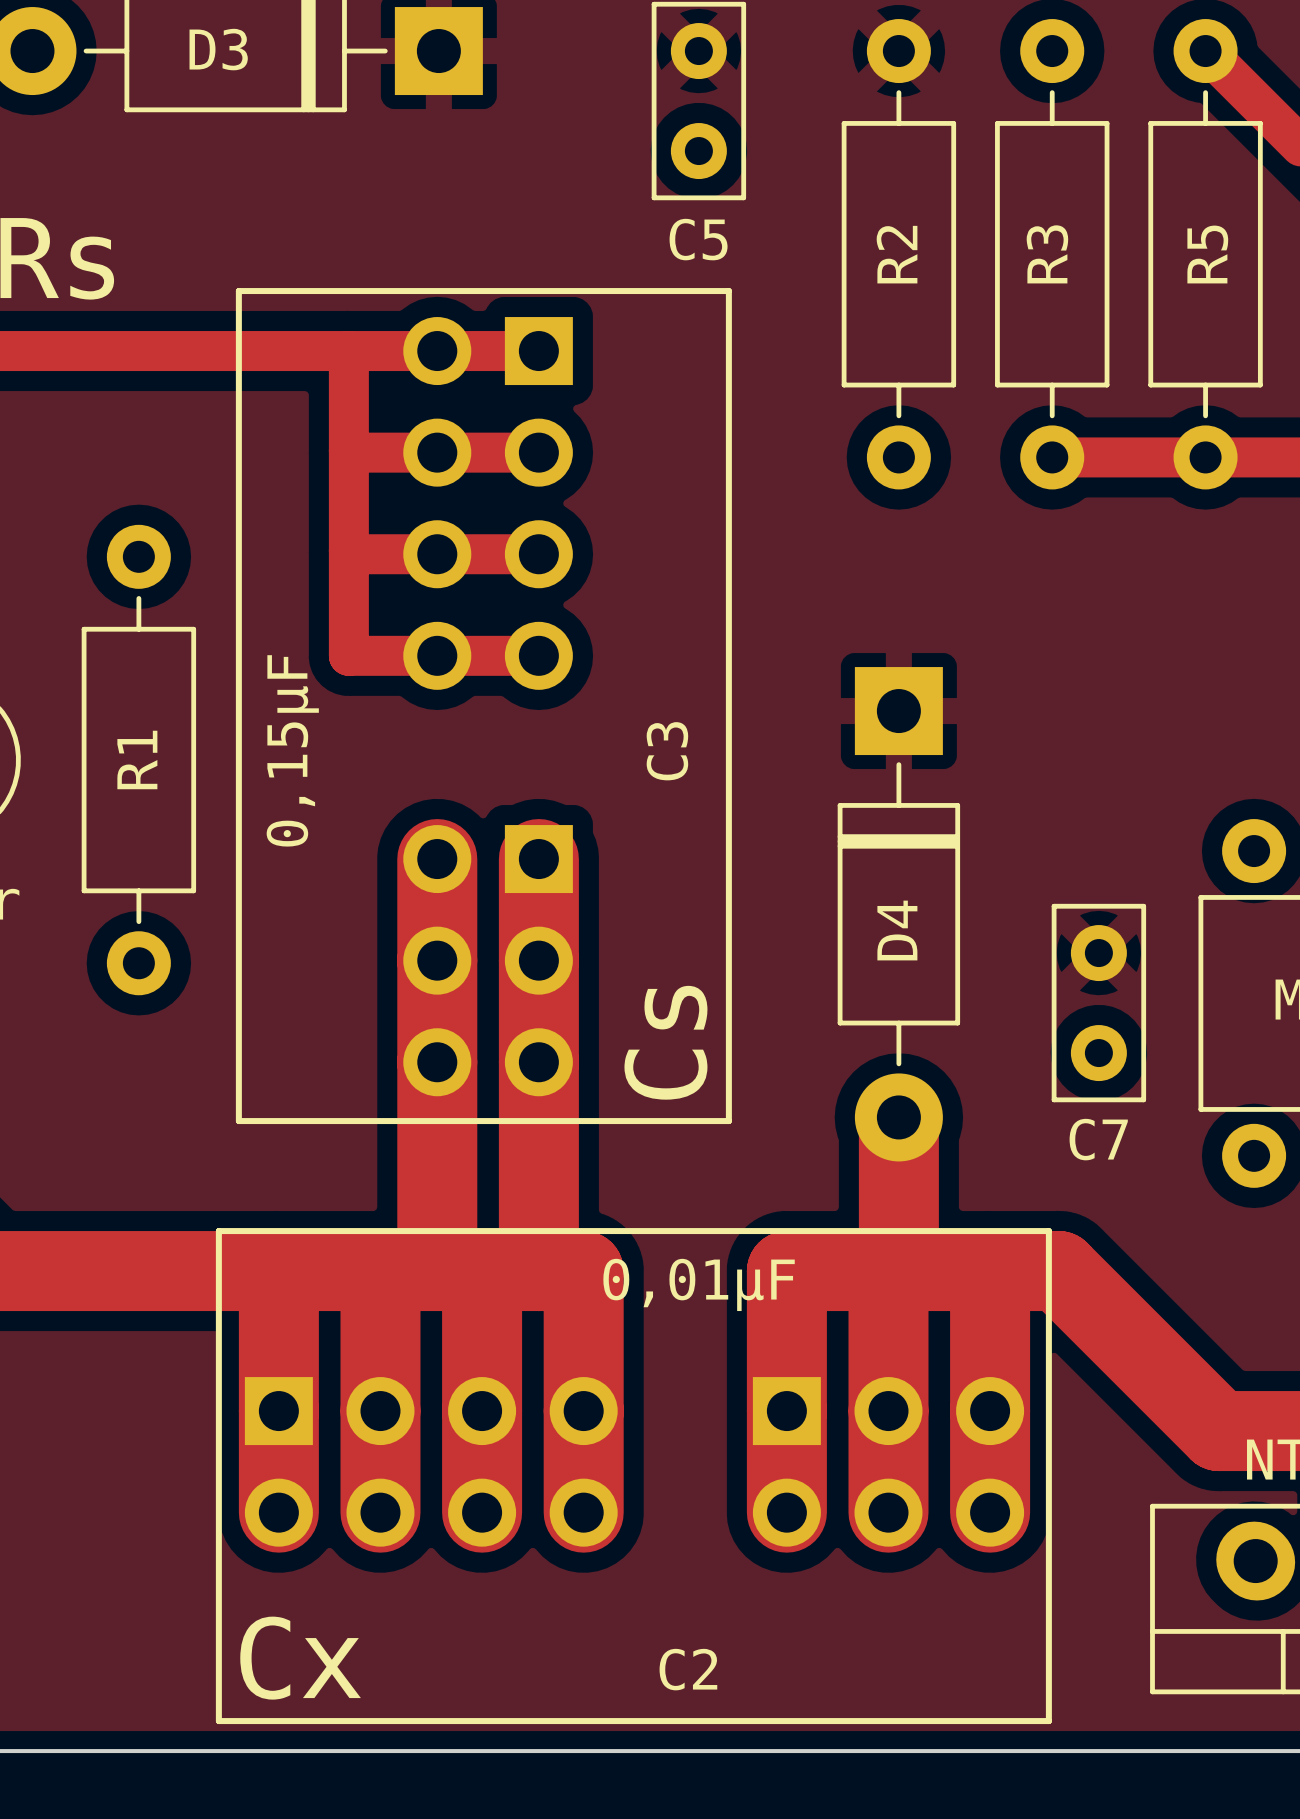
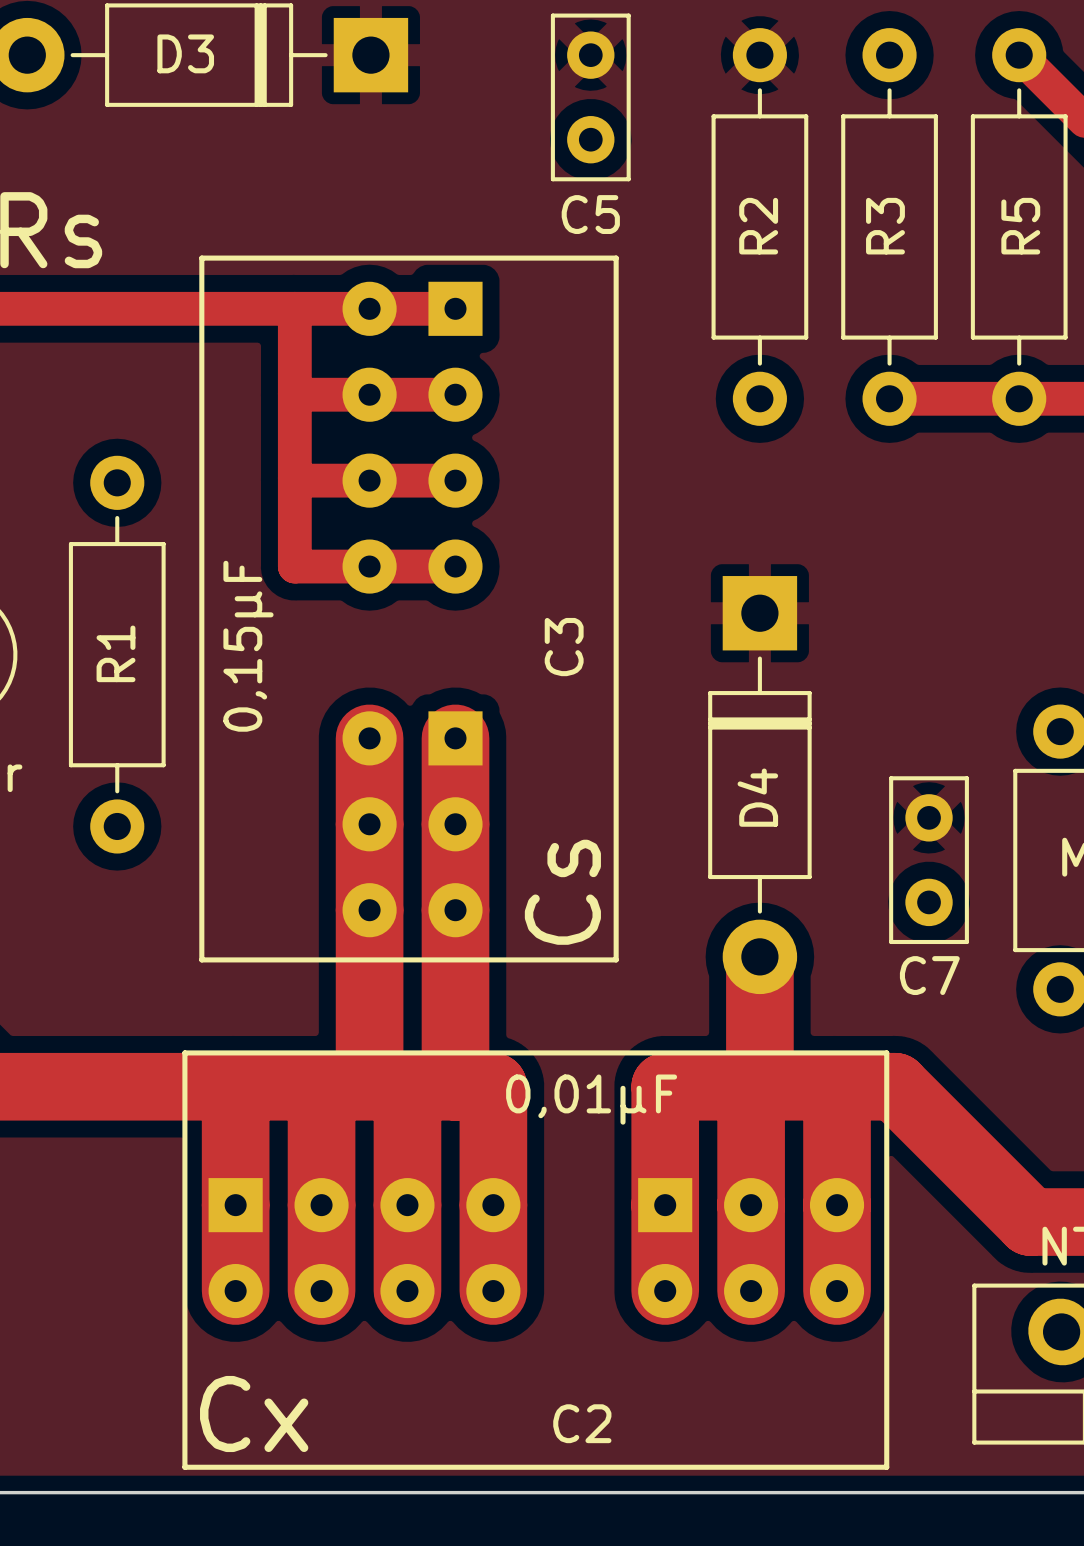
part footprint: [403, 317, 573, 690] -> [342, 281, 483, 594]
part footprint: [403, 825, 573, 1097] -> [342, 711, 483, 938]
part footprint: [244, 1377, 618, 1547] -> [208, 1178, 521, 1319]
part footprint: [752, 1377, 1025, 1547] -> [638, 1178, 865, 1319]

